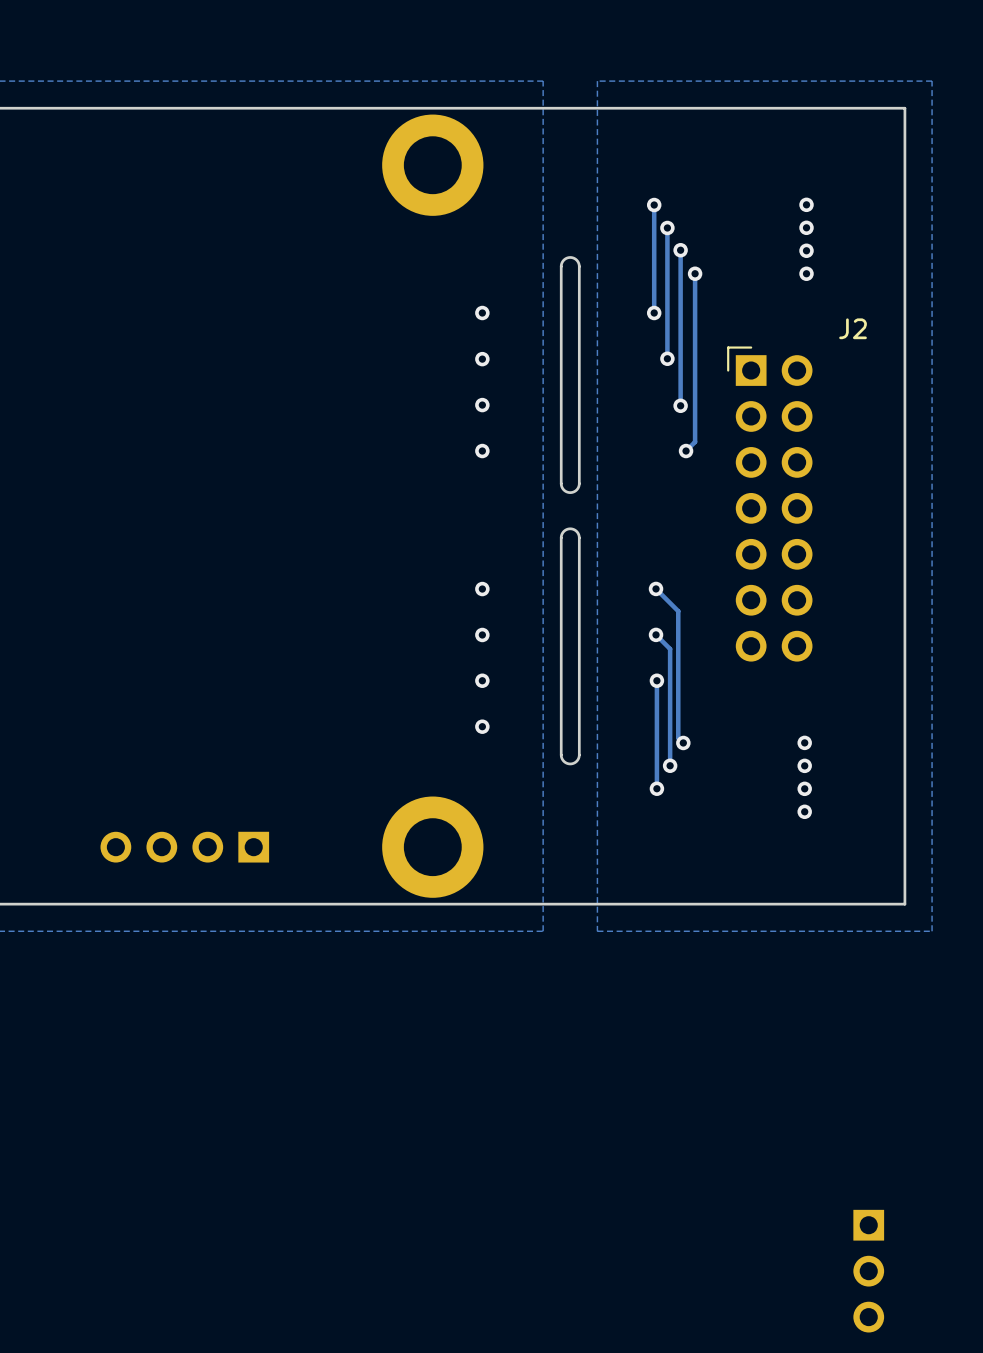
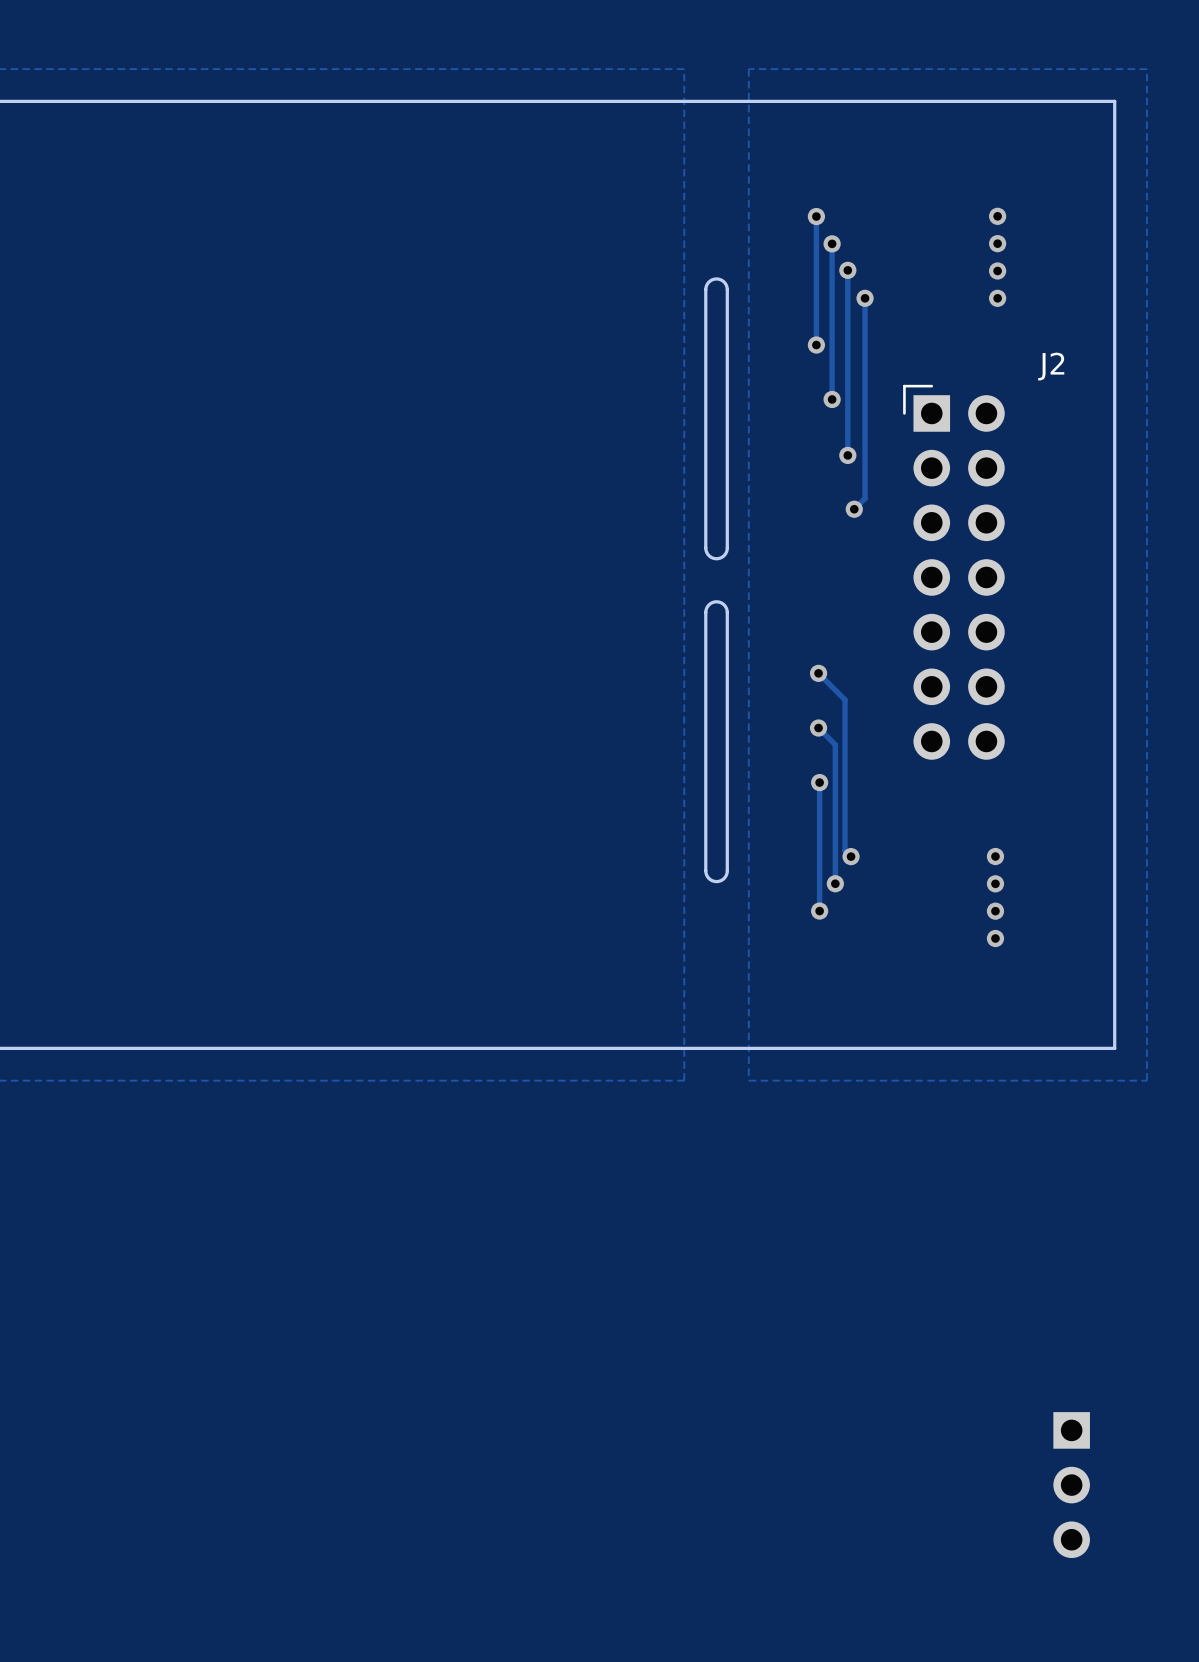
part: (432, 165) -> none
via: (482, 313) -> none
via: (482, 359) -> none
via: (482, 405) -> none
via: (482, 451) -> none
via: (482, 589) -> none
via: (482, 634) -> none
via: (482, 680) -> none
via: (482, 726) -> none
part: (184, 847) -> none
part: (432, 847) -> none

